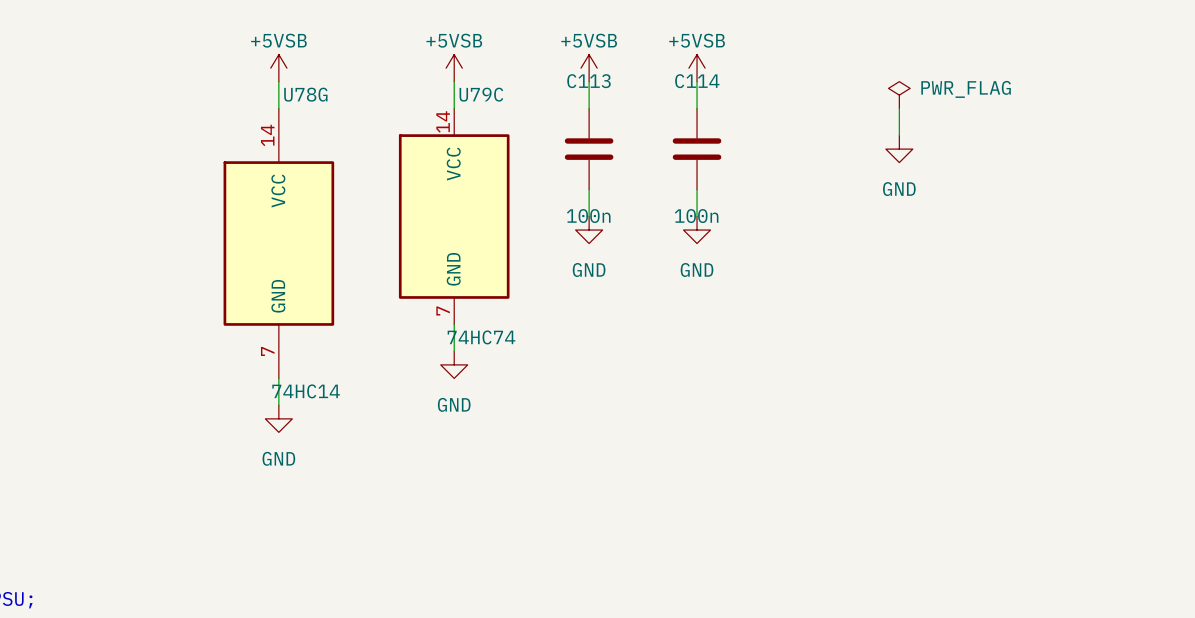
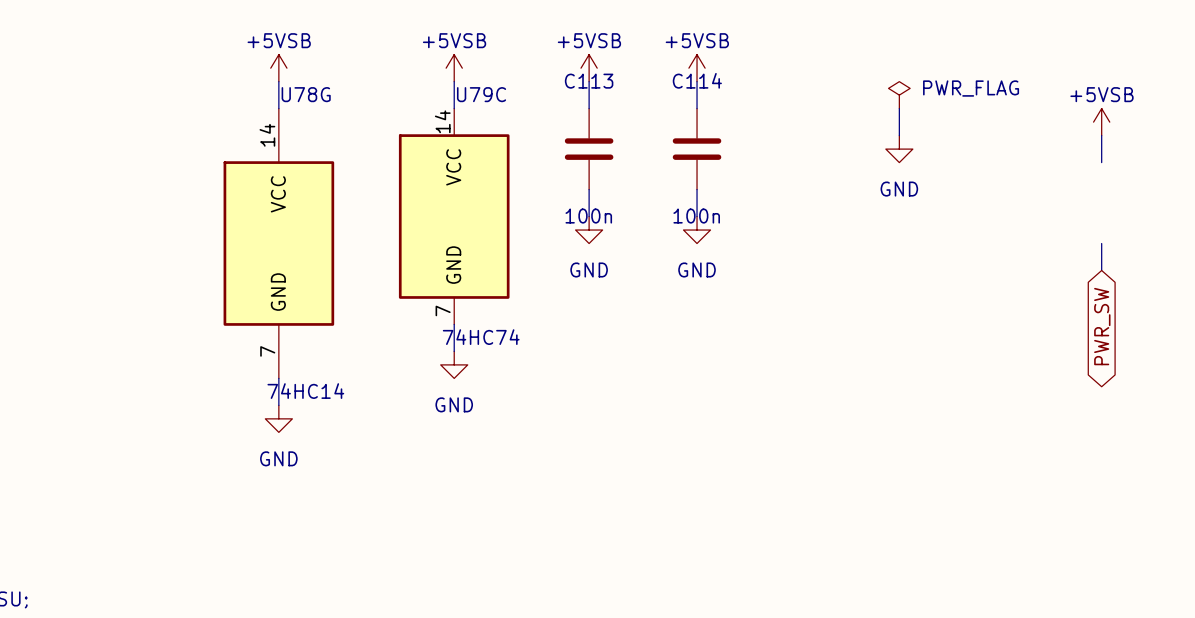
power symbol: none -> +5VSB (1101, 122)
wire: none -> (1101, 135) (1101, 162)
wire: none -> (1101, 243) (1101, 270)
global label: none -> PWR_SW (1102, 326)

